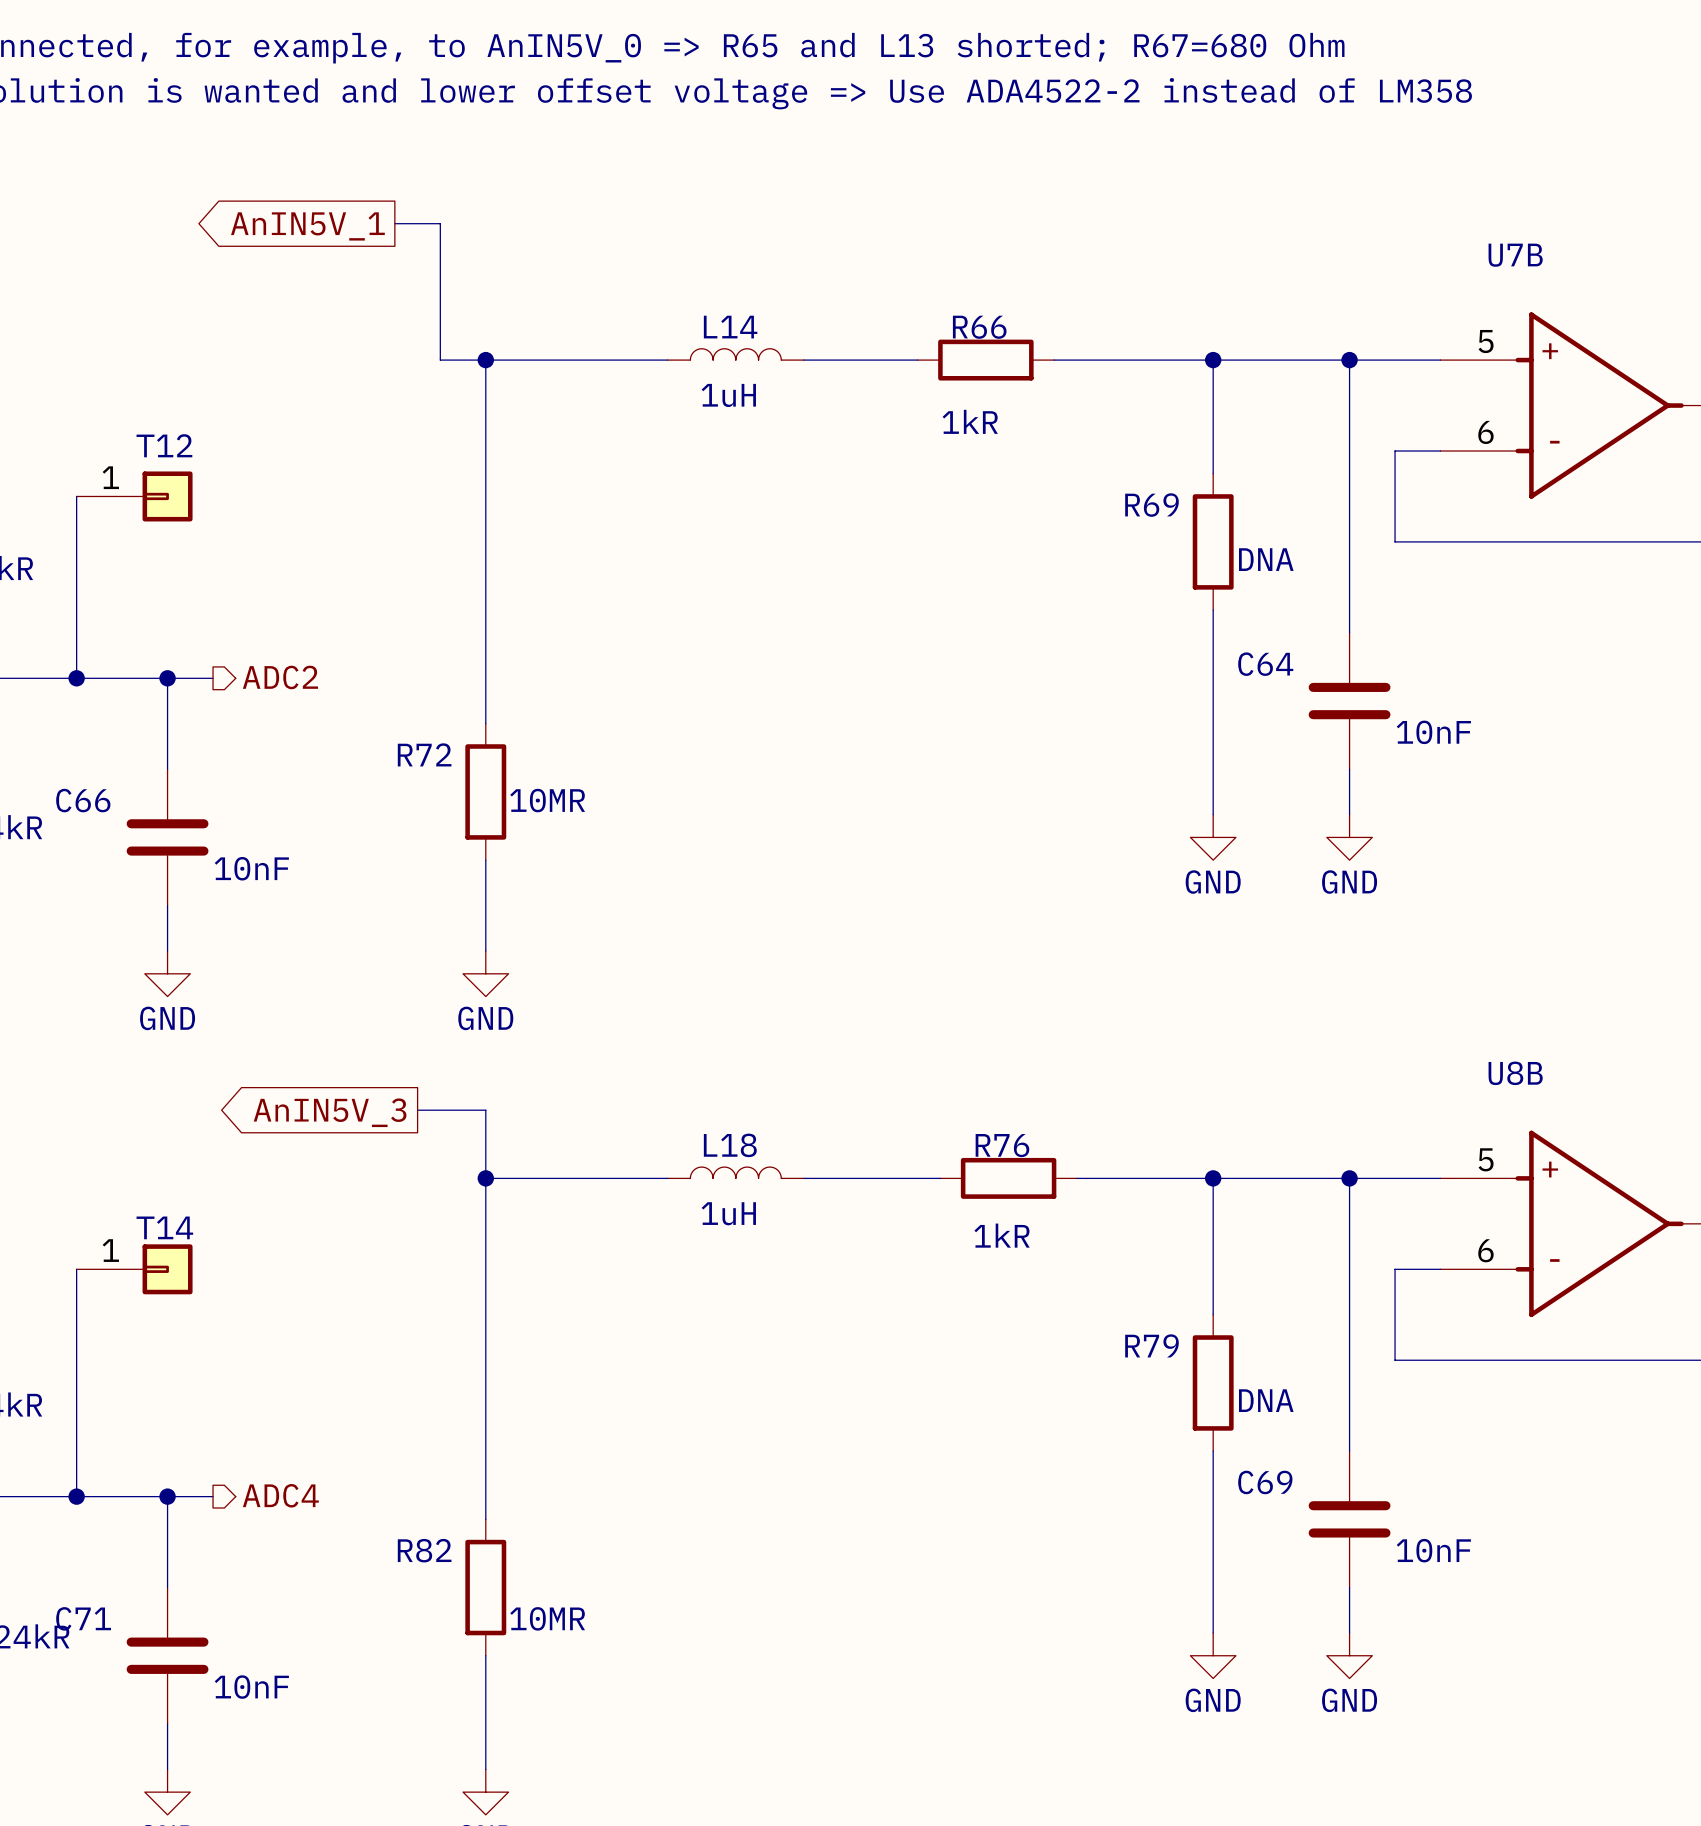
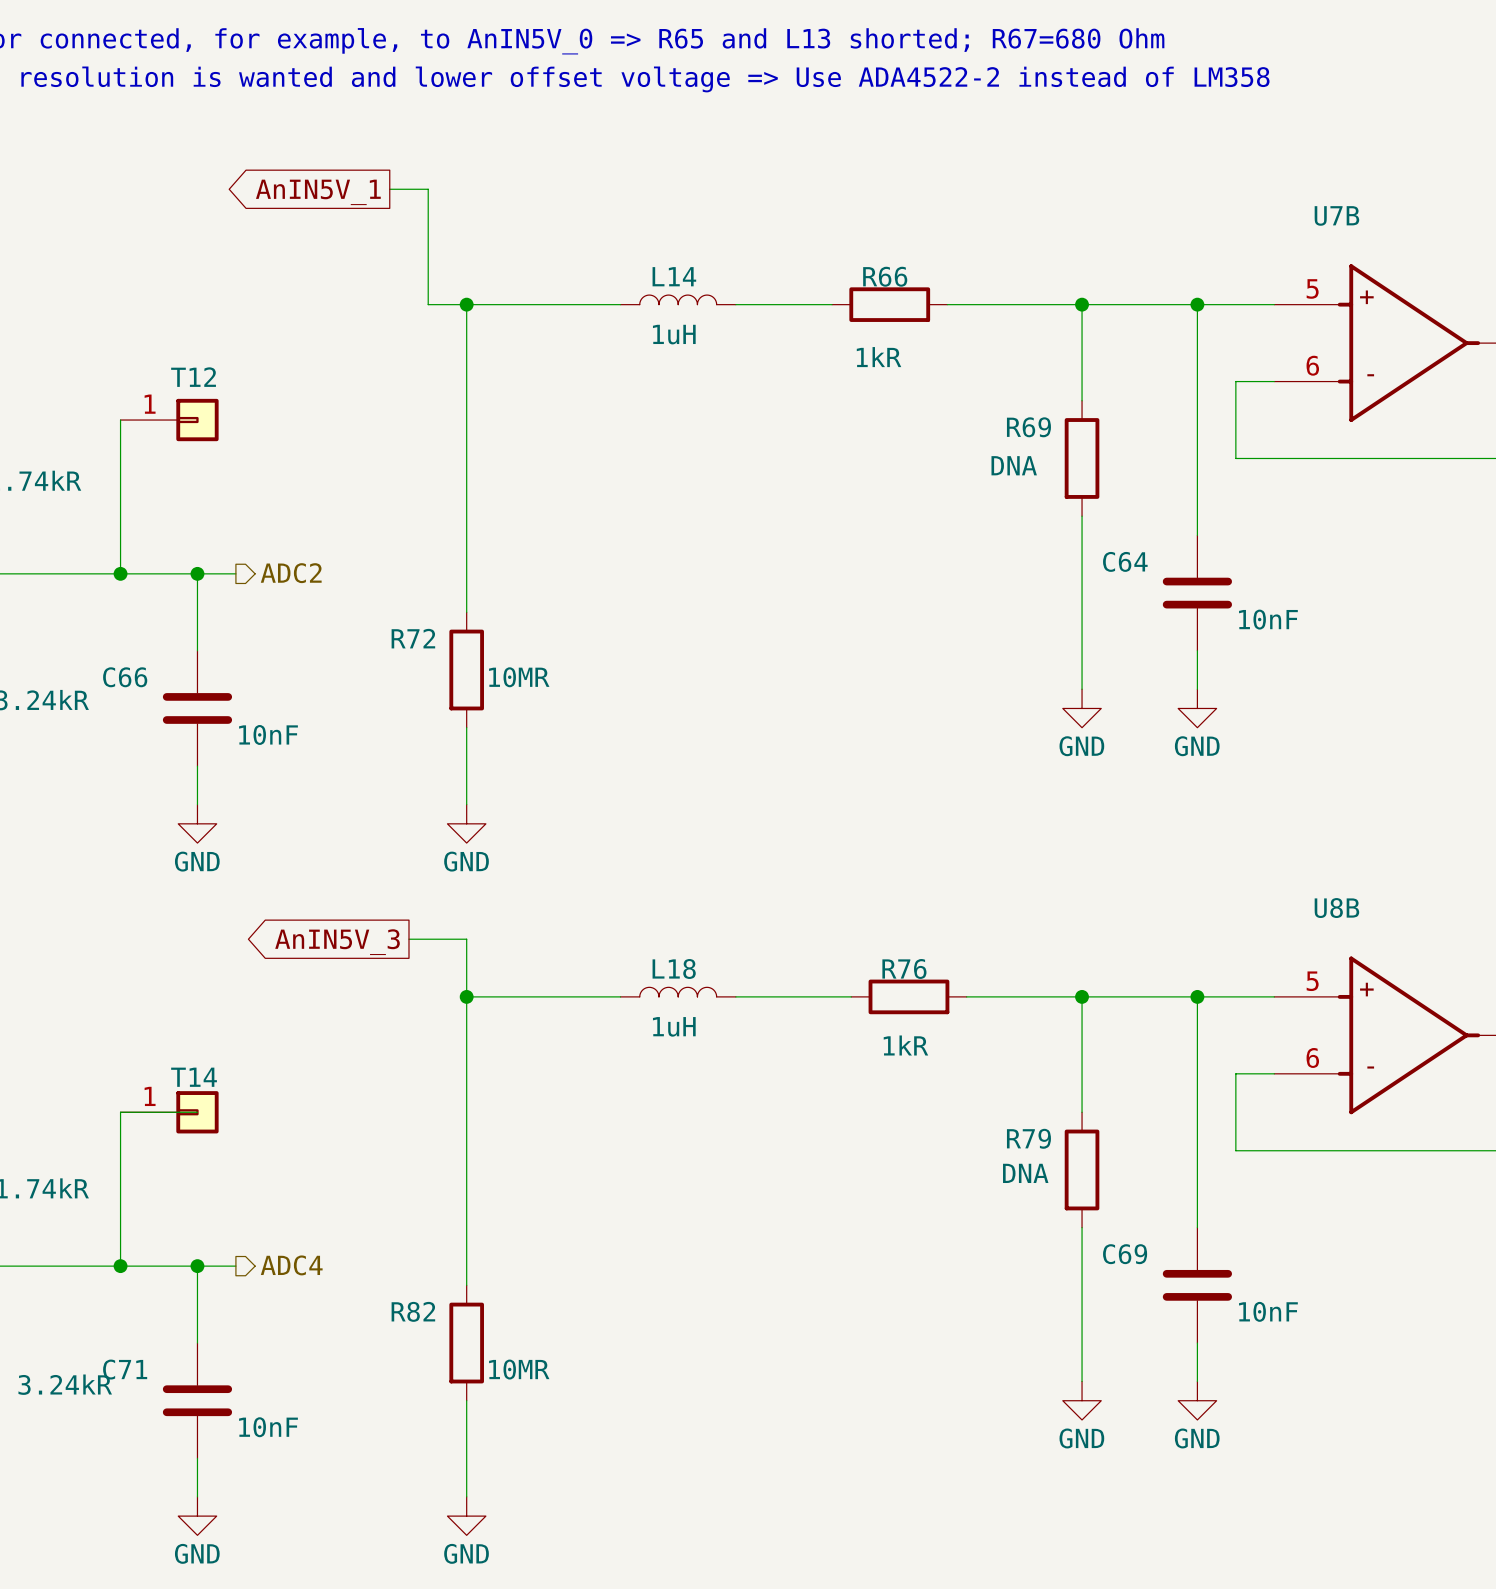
R69 value position: DNA (1266, 559) -> DNA (1014, 465)
wire: (76, 1269) (76, 1314) -> (197, 1112) (120, 1112)
T14 position: (134, 1269) -> (169, 1112)
R79 value position: DNA (1266, 1400) -> DNA (1025, 1173)

